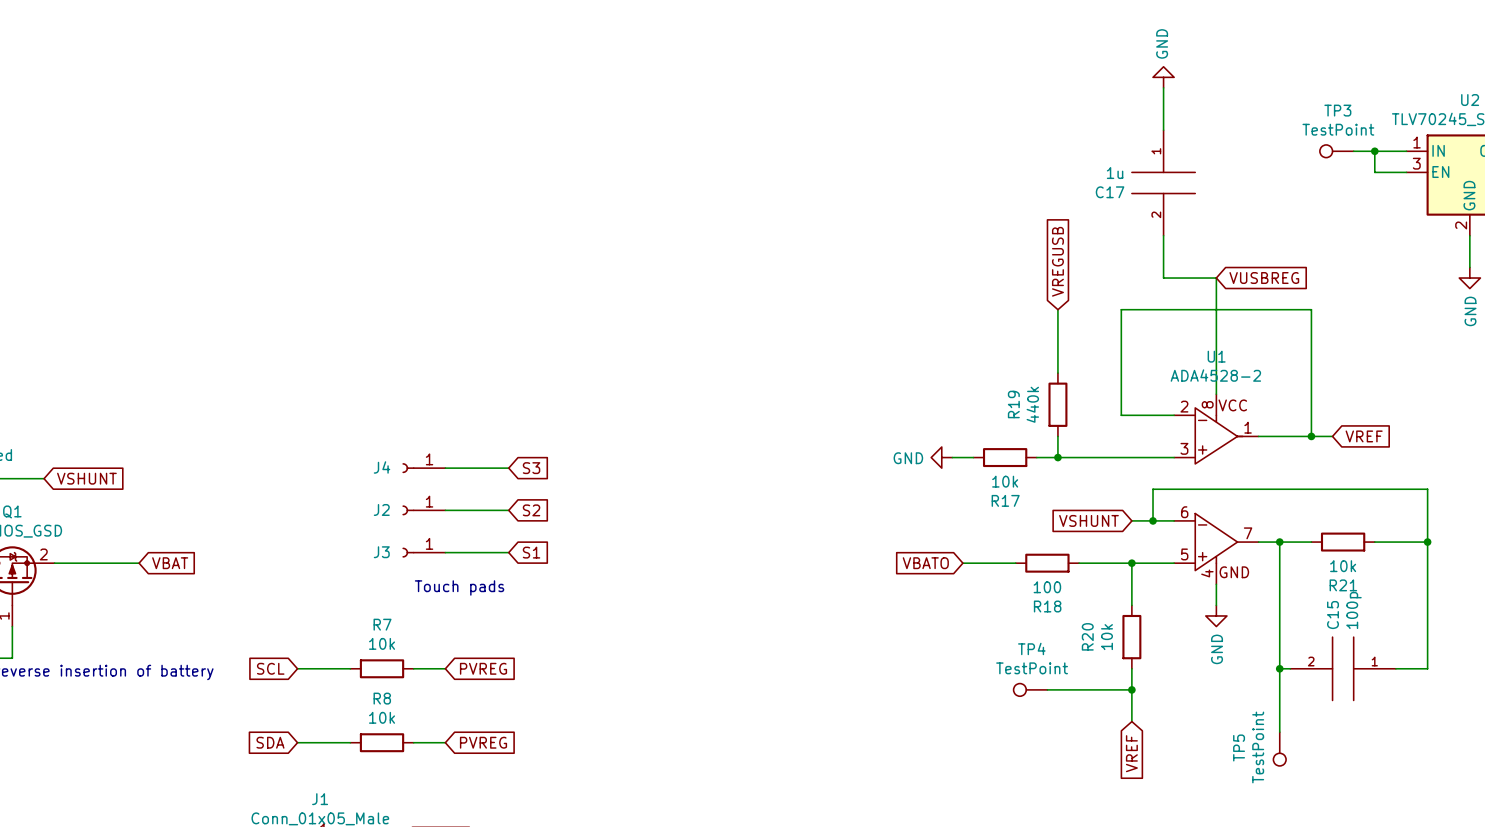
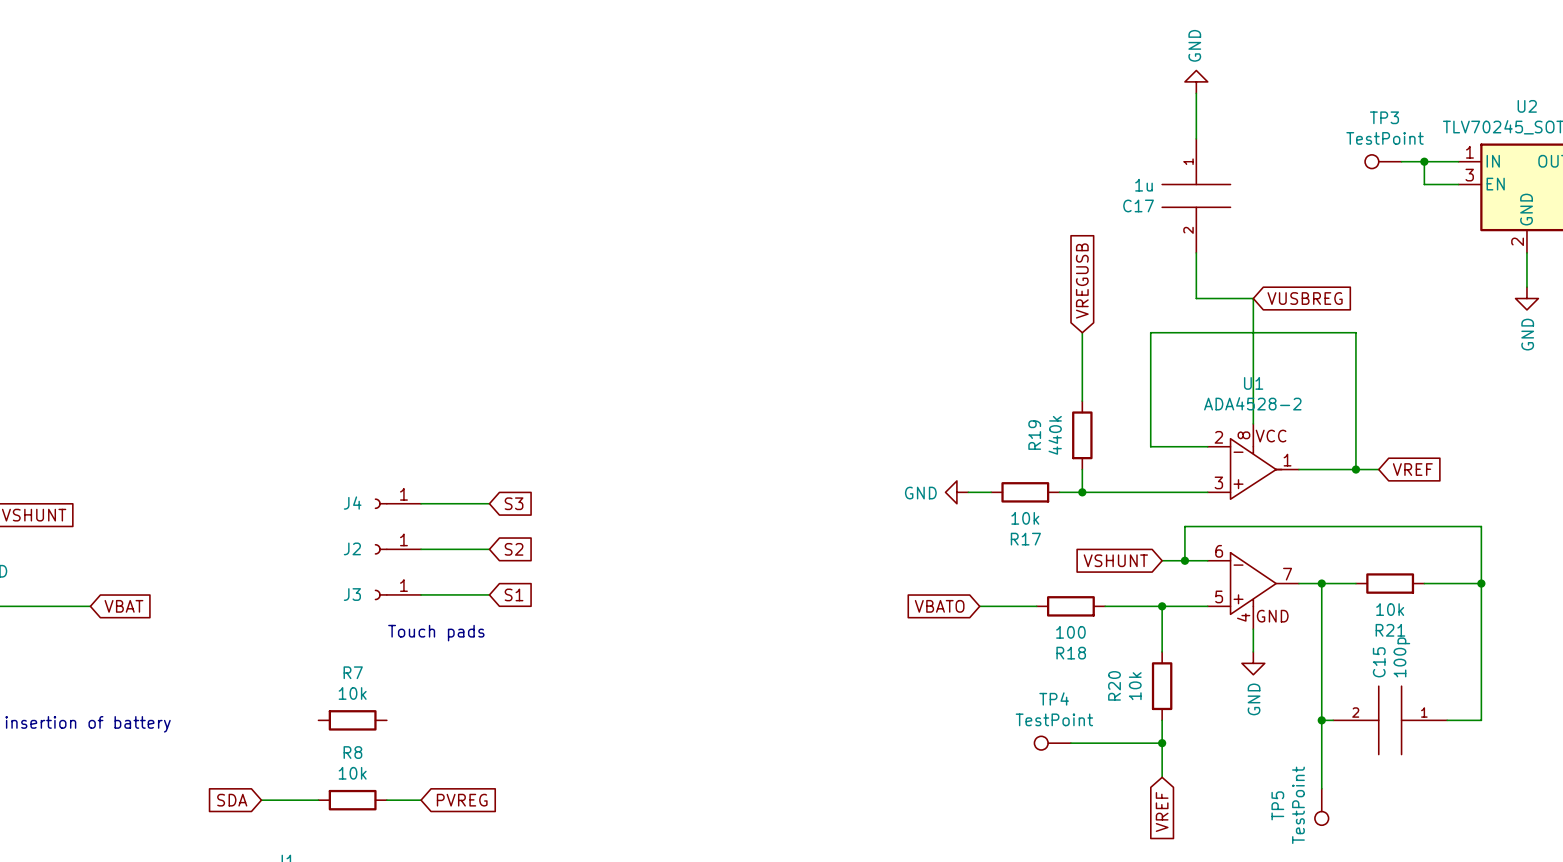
global label: SCL (270, 668) -> none
wire: (297, 668) (350, 668) -> none
wire: (413, 668) (445, 668) -> none
global label: PVREG (483, 668) -> none

